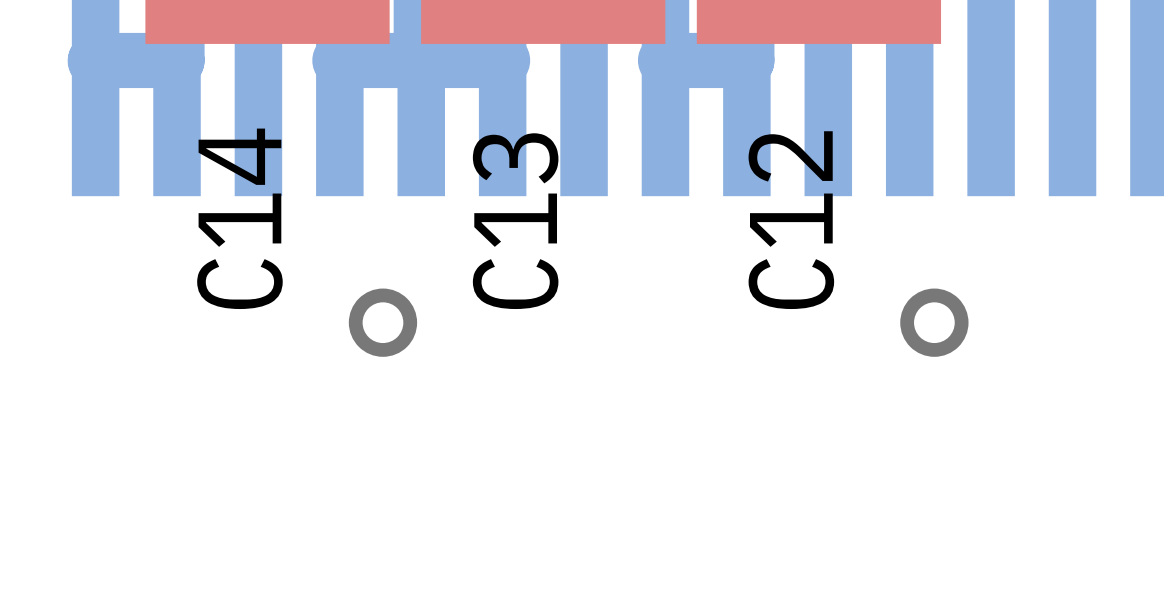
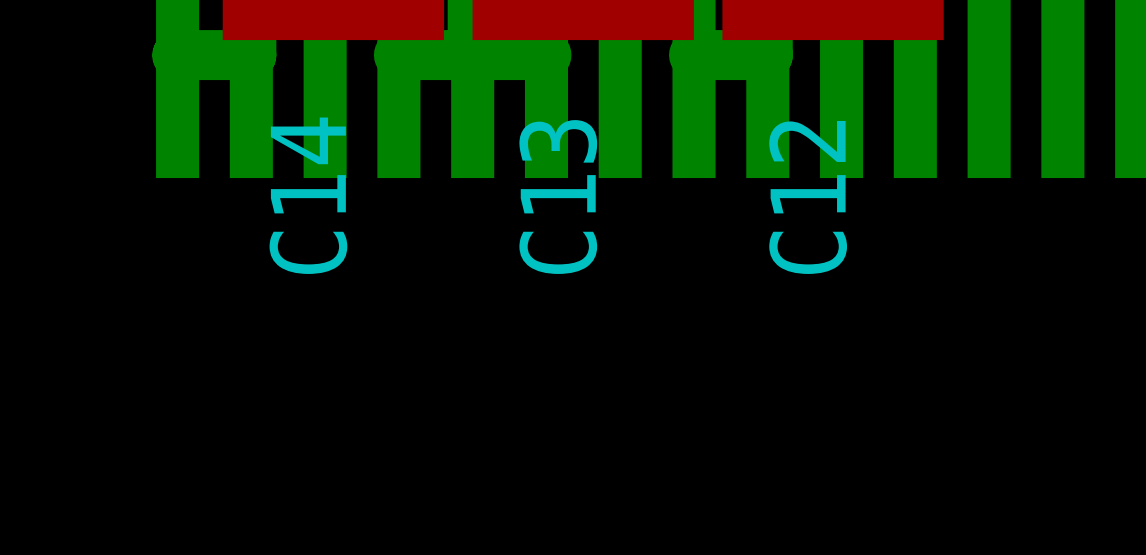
via: (382, 322) -> none
via: (934, 322) -> none

